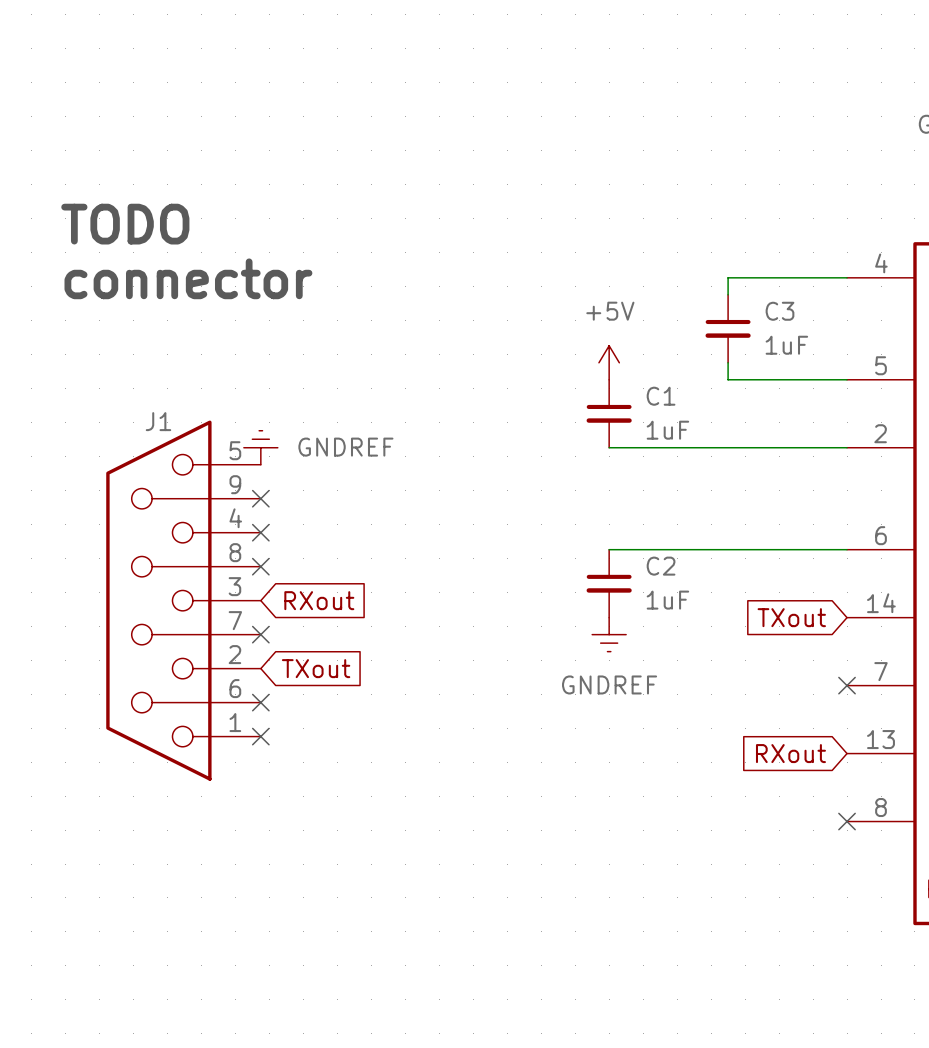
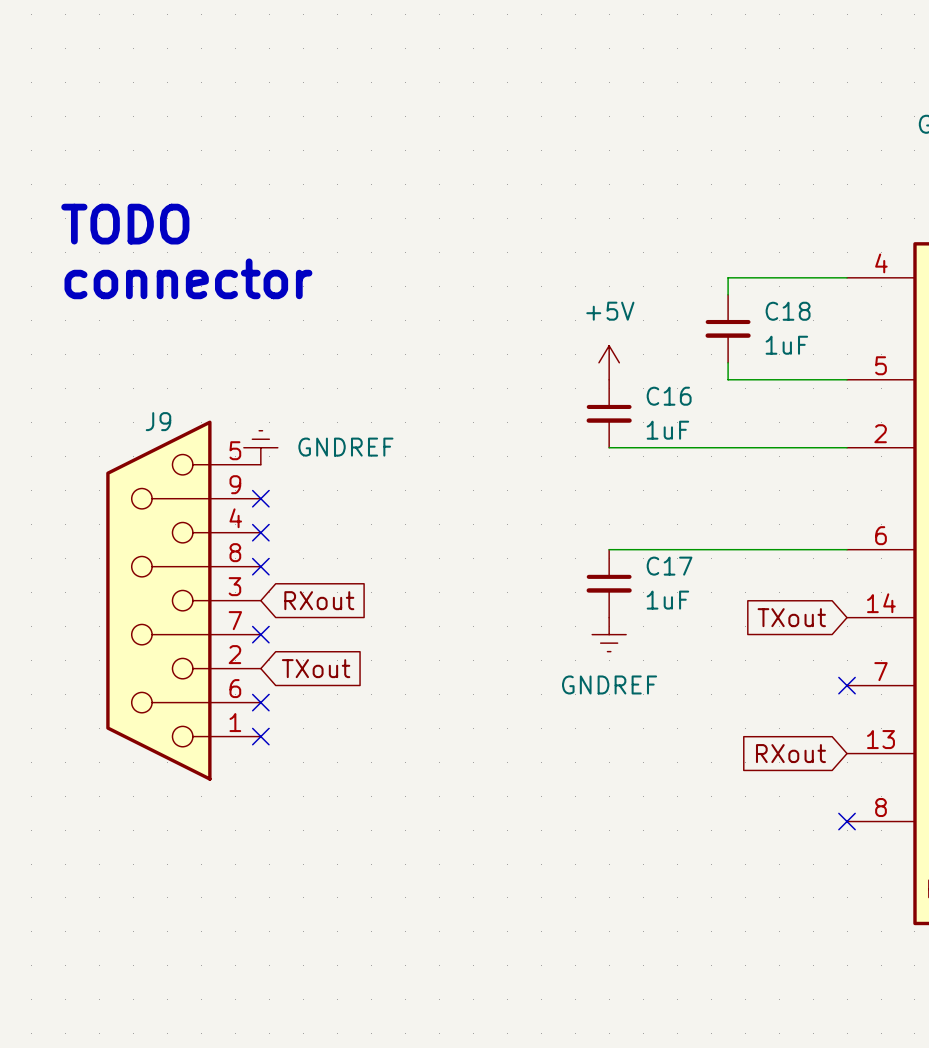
C3 name: C3 (779, 311) -> C18 (788, 311)
C1 name: C1 (661, 396) -> C16 (669, 396)
J1 name: J1 (158, 421) -> J9 (158, 421)
C2 name: C2 (661, 566) -> C17 (669, 566)

